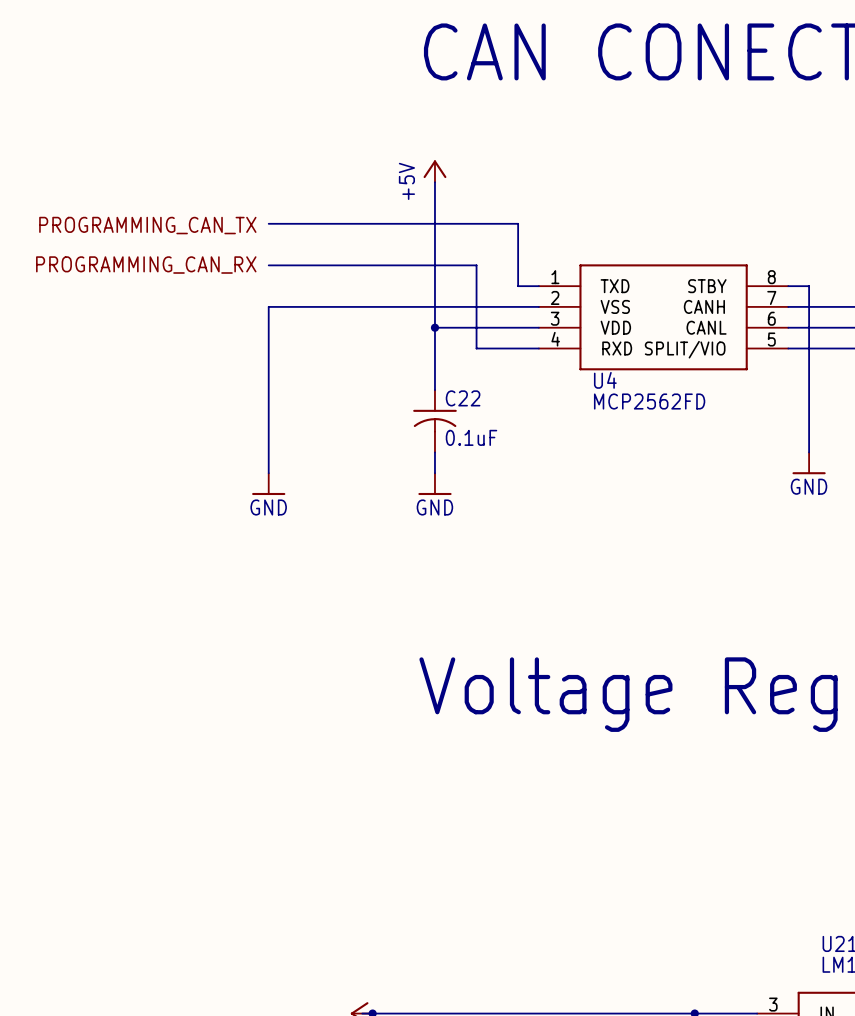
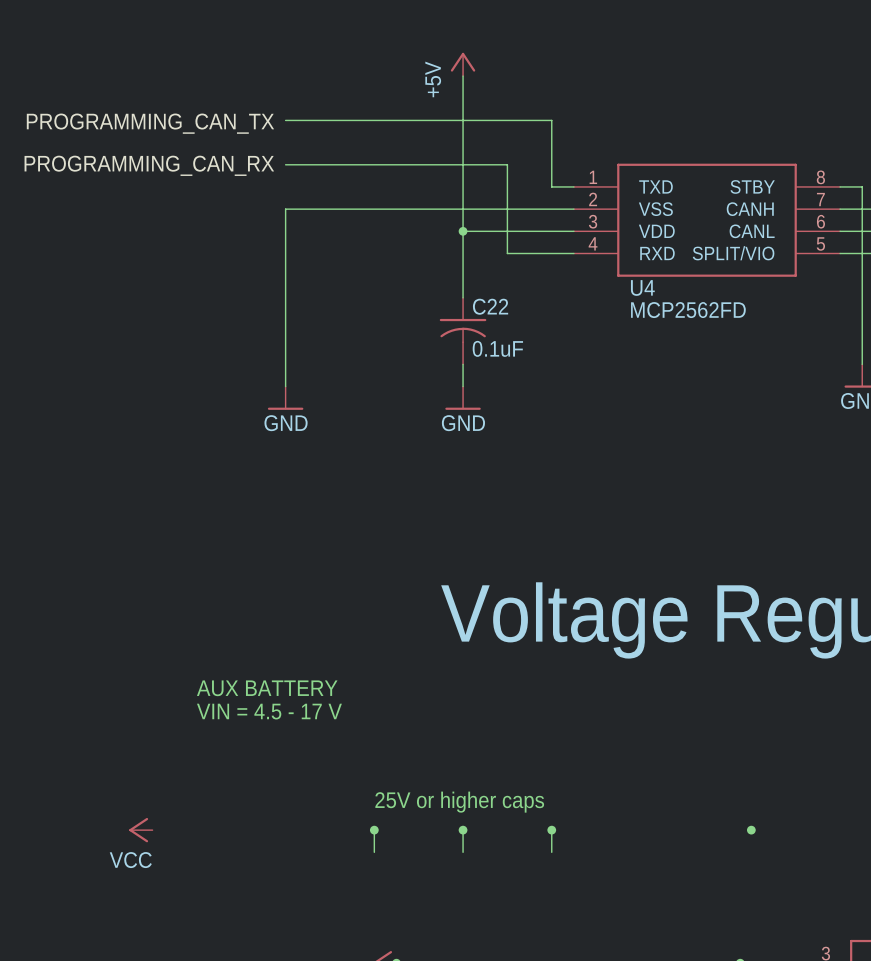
text: none -> AUX BATTERY (267, 688)
text: none -> VIN = 4.5 - 17 V (269, 711)
text: none -> 25V or higher caps (459, 802)
power symbol: none -> VCC (140, 830)
wire: none -> (374, 830) (374, 852)
junction: none -> (374, 830)
wire: none -> (463, 830) (463, 852)
junction: none -> (463, 830)
wire: none -> (551, 830) (551, 852)
junction: none -> (551, 830)
junction: none -> (751, 830)

